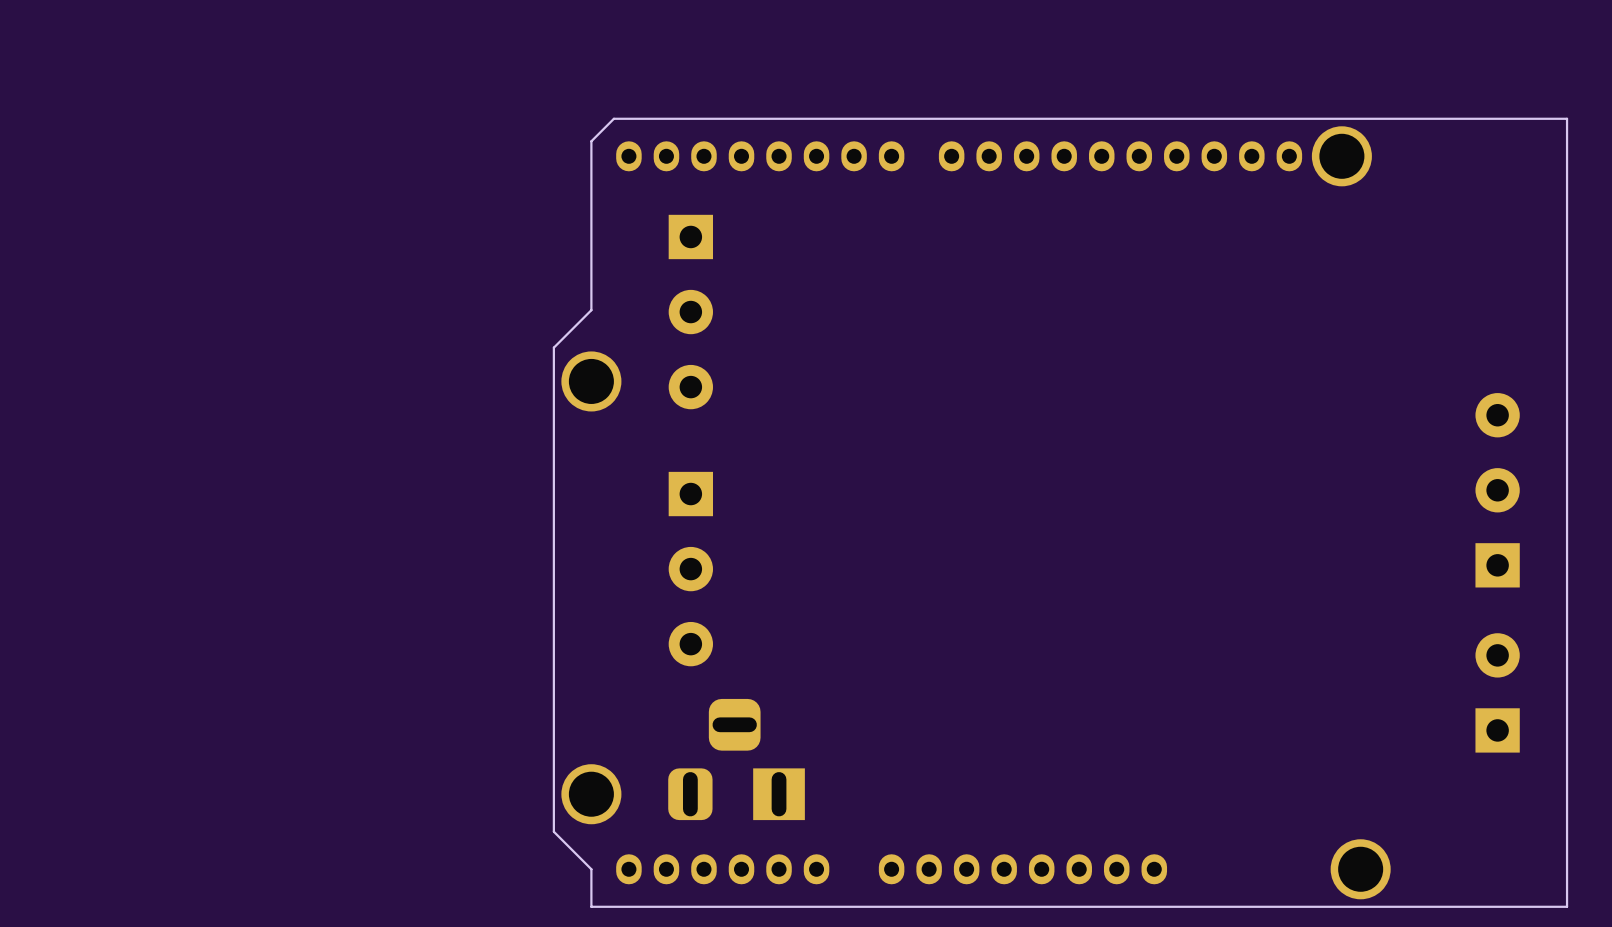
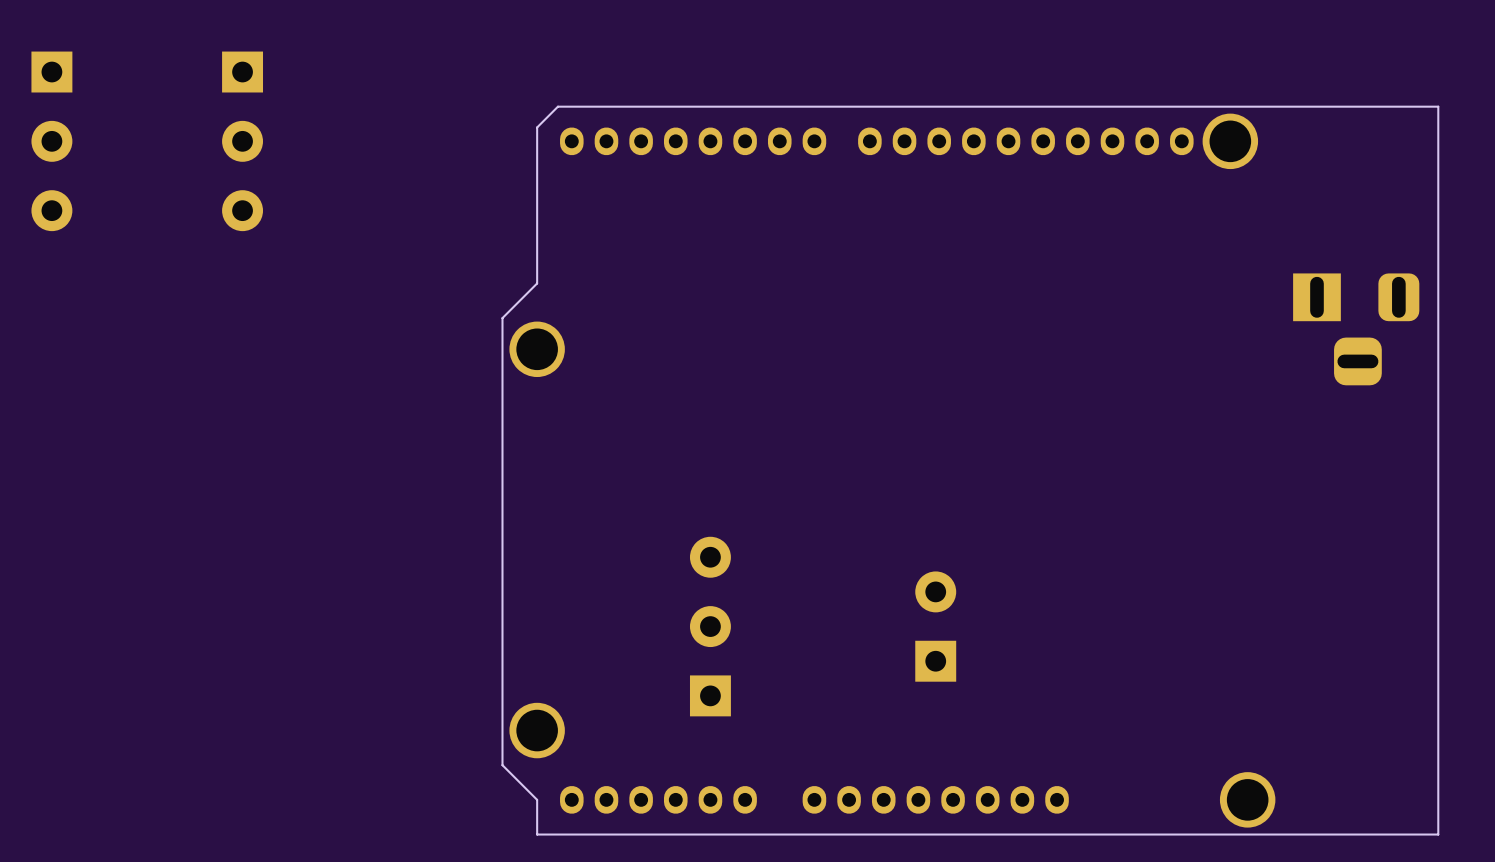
part: none -> (51, 141)
part: none -> (242, 141)
part: (690, 312) -> none
part: none -> (1356, 329)
part: (1497, 490) -> none
part rotation: 0° (690, 569) -> 180° (710, 626)
part position: (690, 569) -> (710, 626)
part: none -> (935, 626)
part: (1497, 692) -> none
part: (736, 759) -> none

